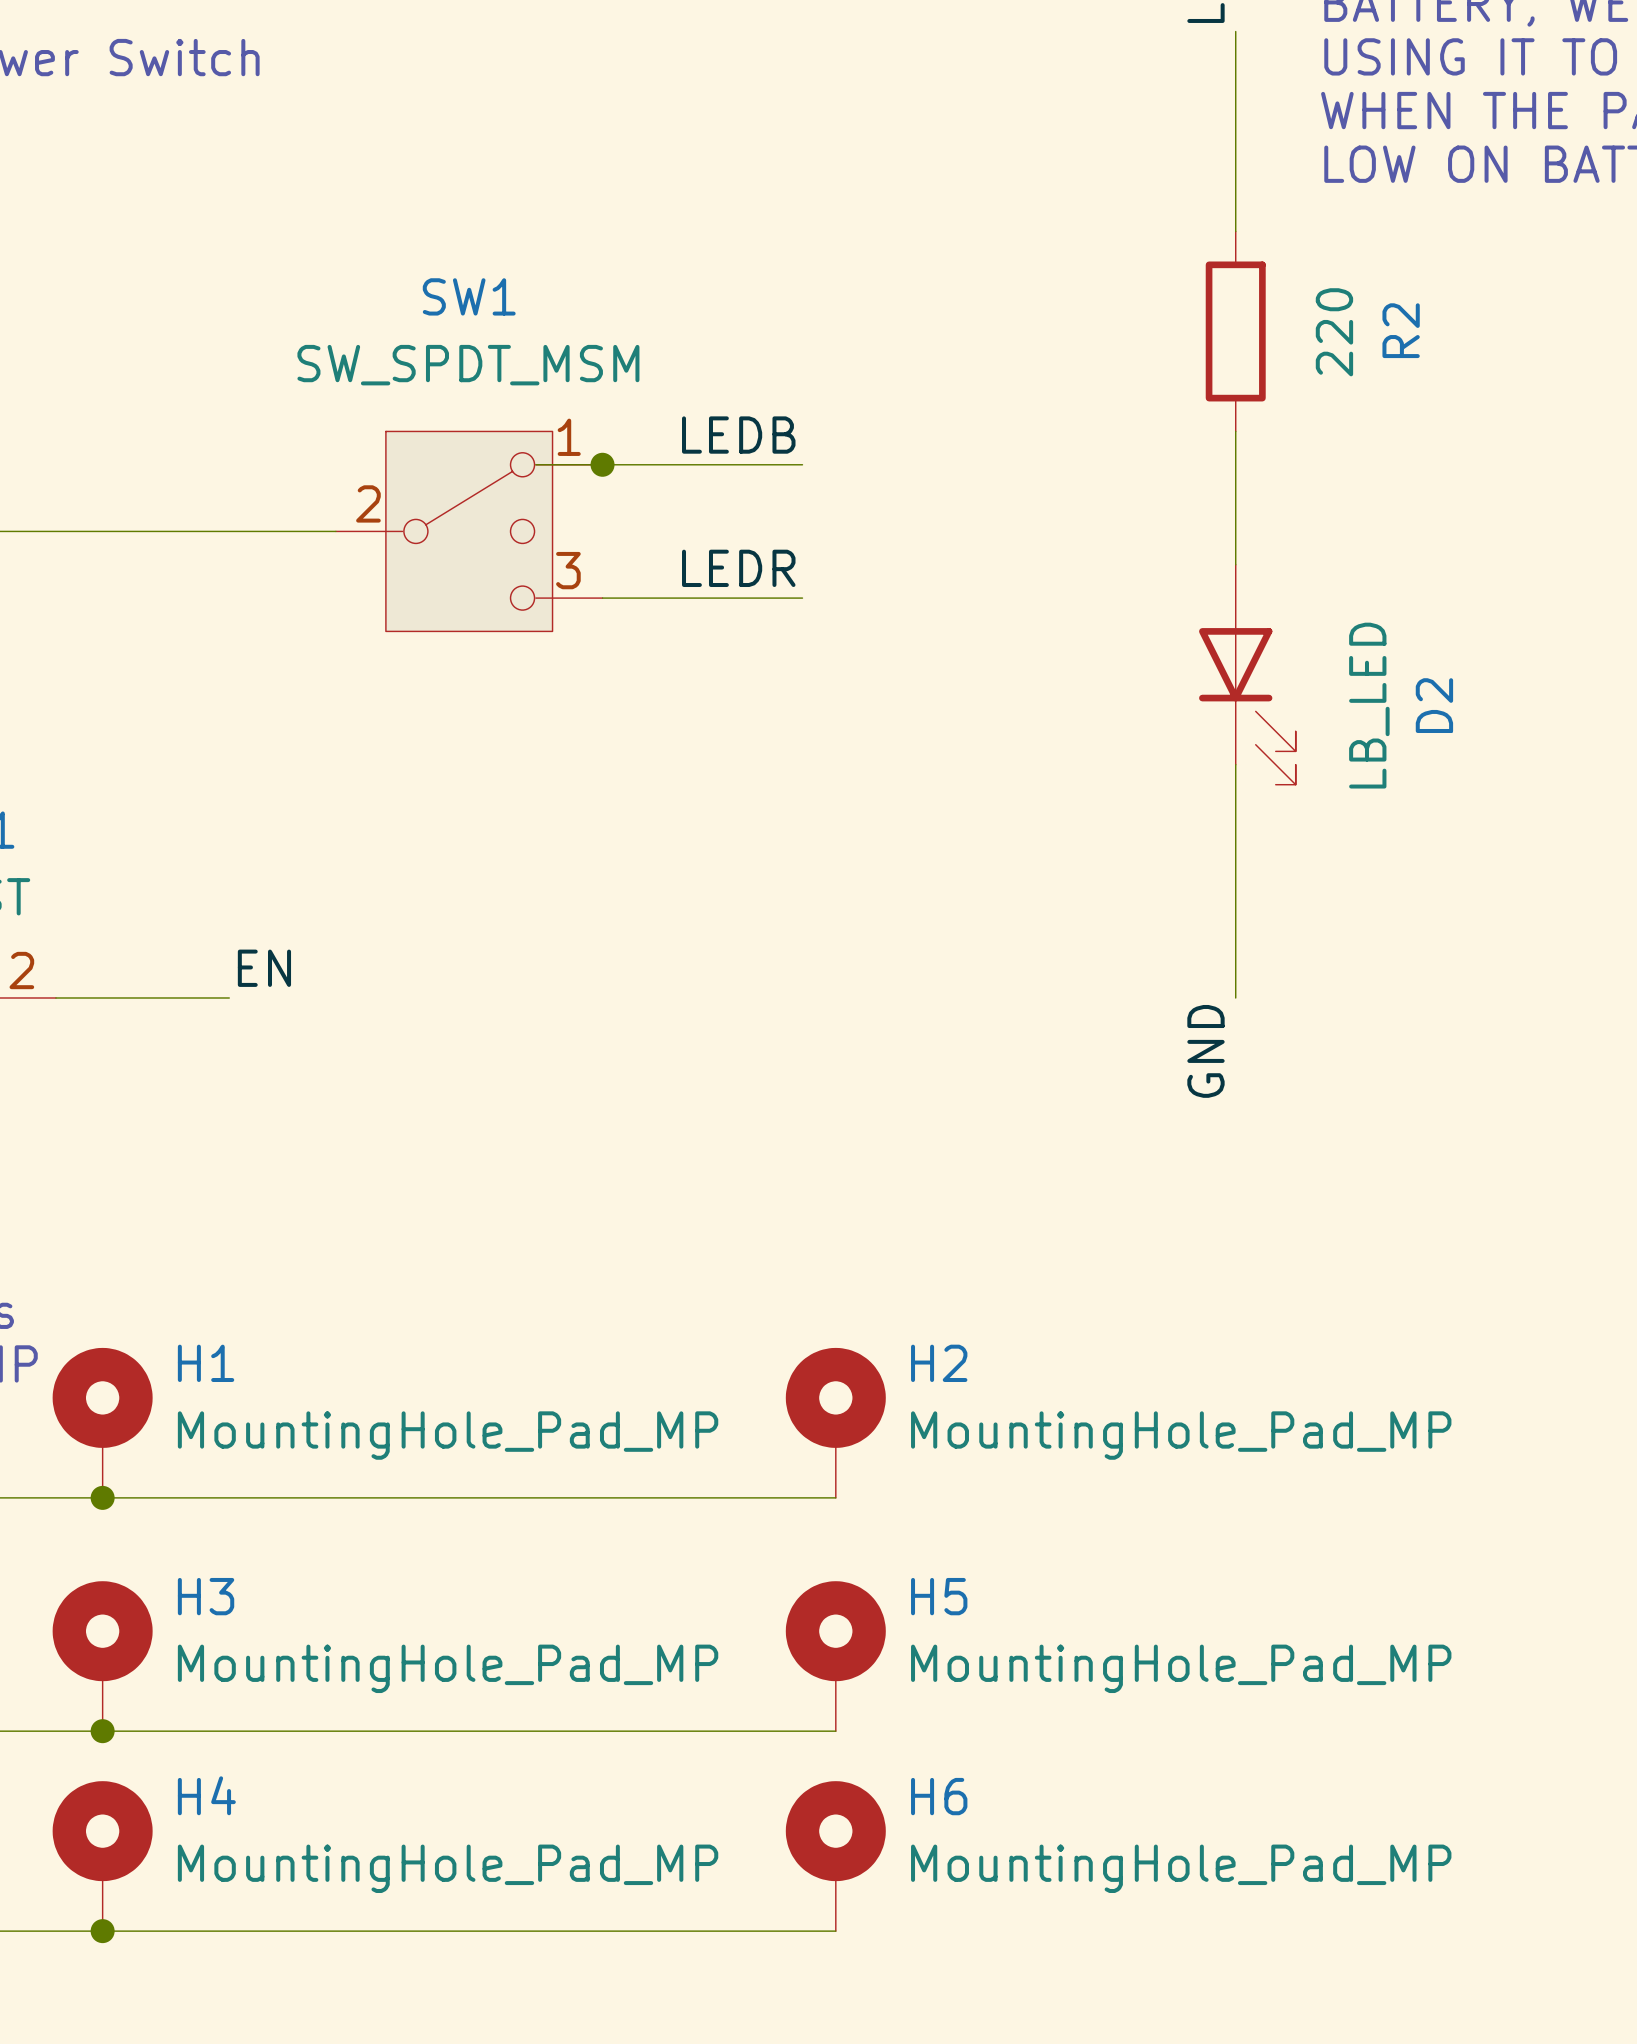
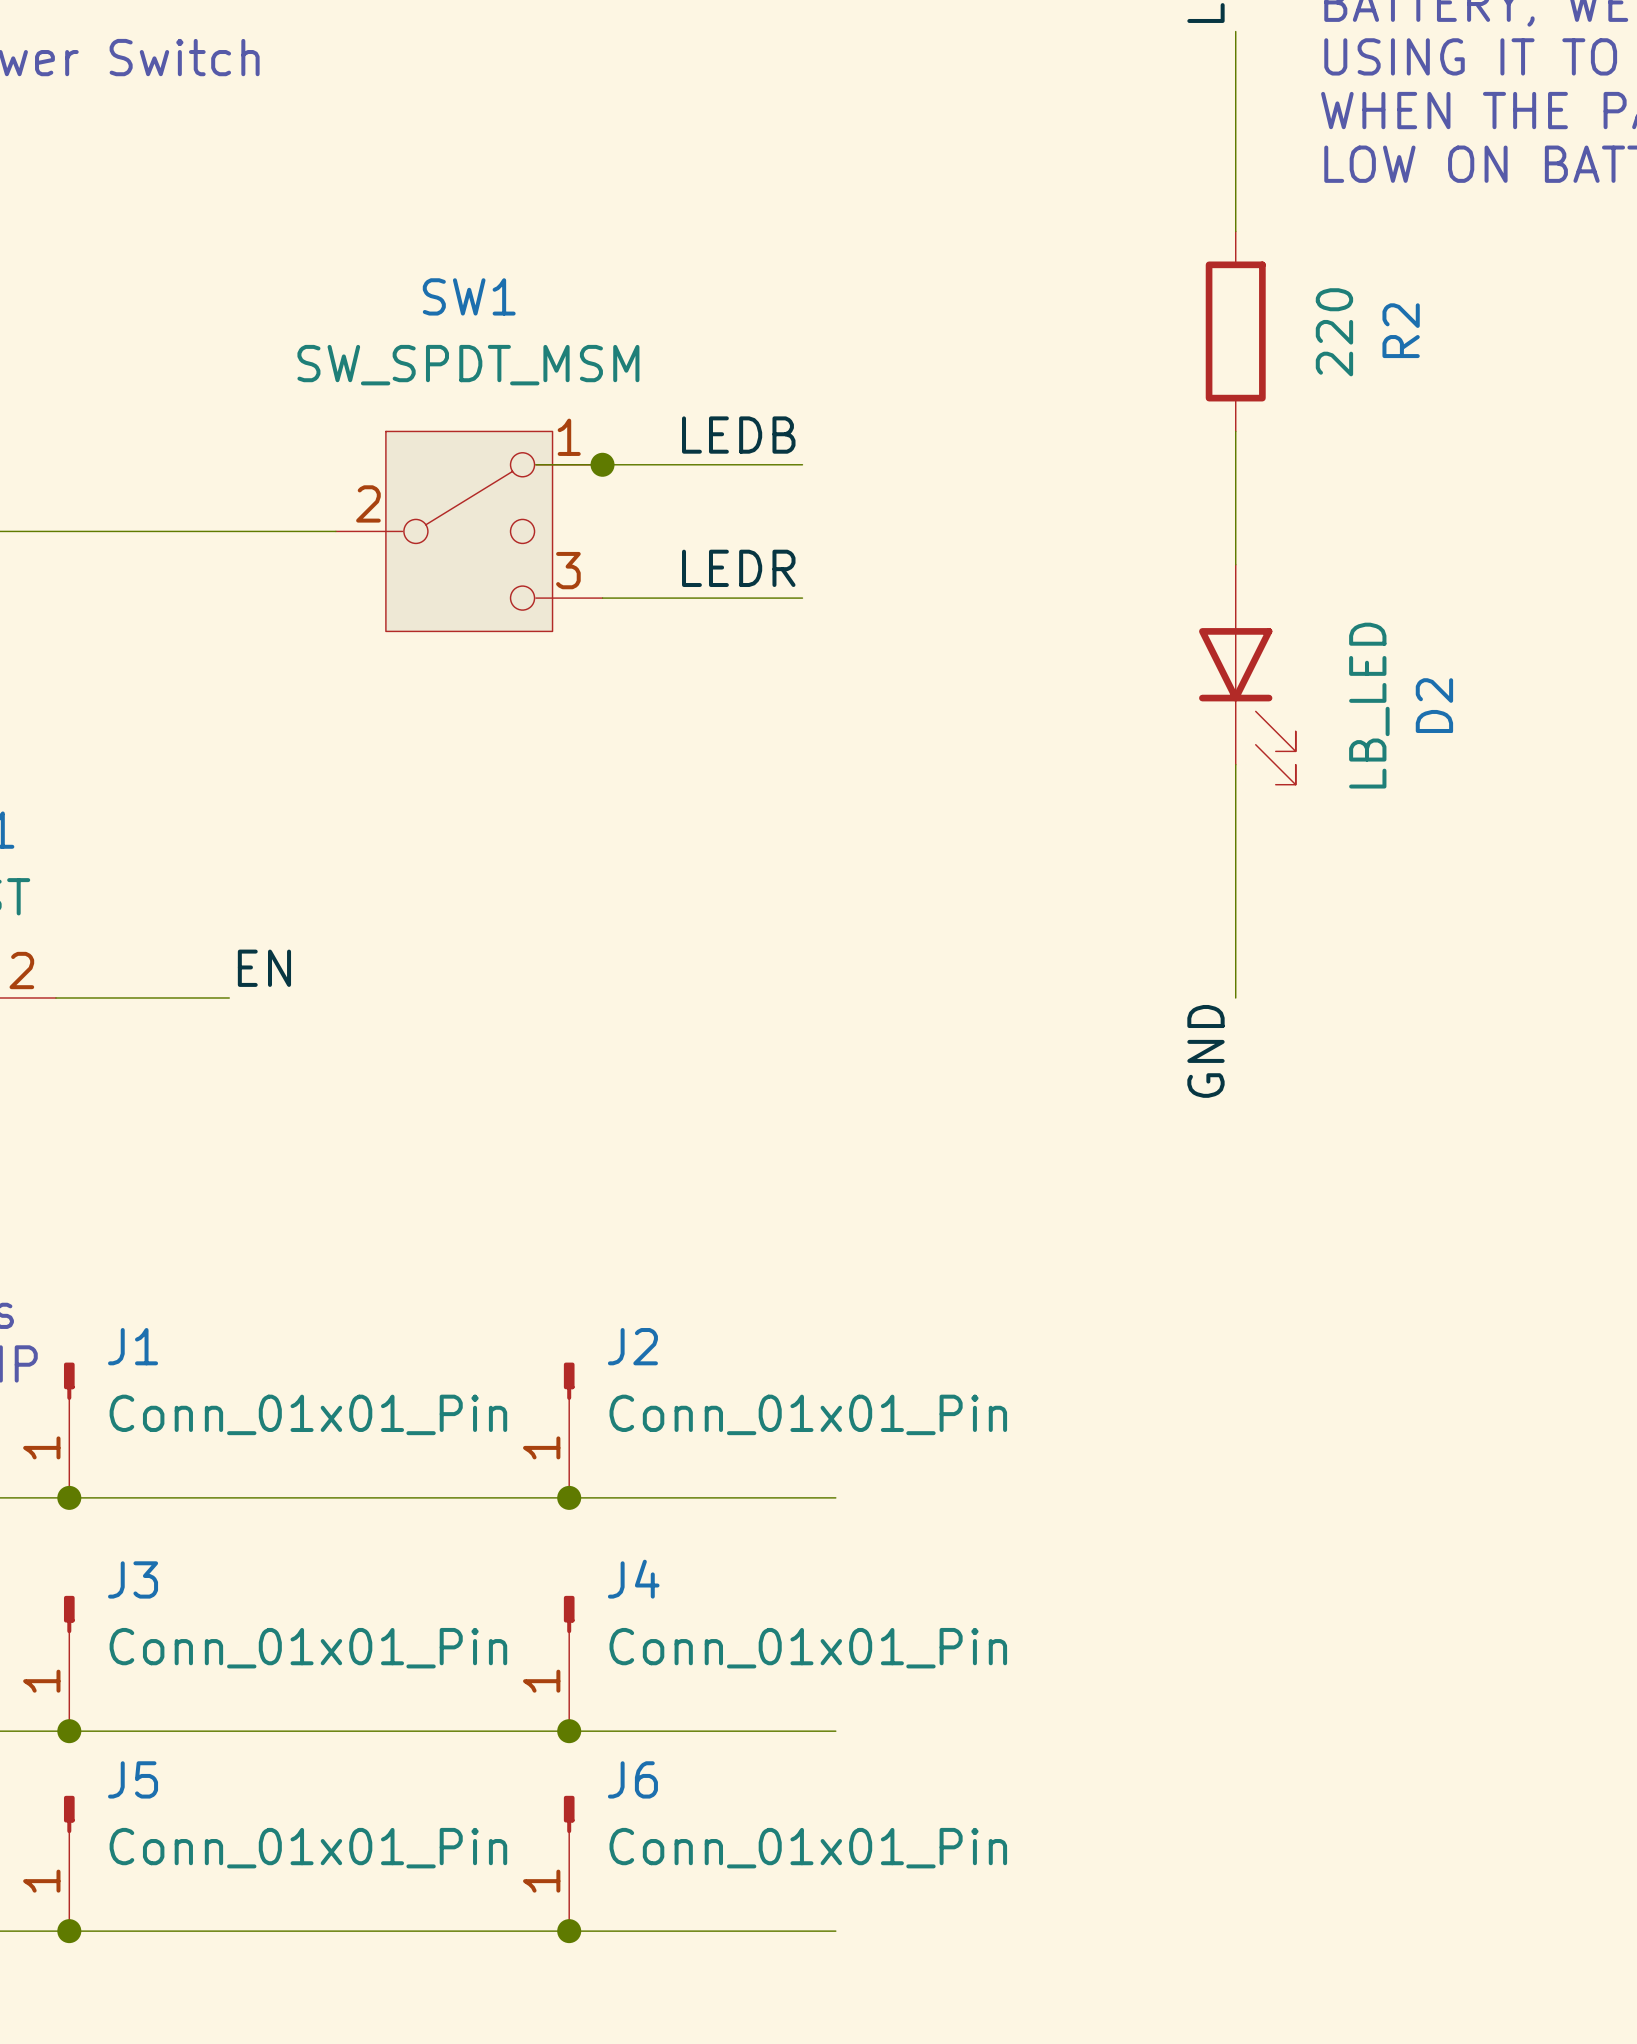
H1: MountingHole_Pad_MP (102, 1422) -> none
H2: MountingHole_Pad_MP (835, 1422) -> none
J1: none -> Conn_01x01_Pin (69, 1430)
J2: none -> Conn_01x01_Pin (569, 1430)
junction position: (102, 1497) -> (69, 1497)
junction: none -> (569, 1497)
H3: MountingHole_Pad_MP (102, 1656) -> none
H5: MountingHole_Pad_MP (835, 1656) -> none
J3: none -> Conn_01x01_Pin (69, 1663)
J4: none -> Conn_01x01_Pin (569, 1663)
junction position: (102, 1731) -> (69, 1731)
junction: none -> (569, 1731)
H4: MountingHole_Pad_MP (102, 1856) -> none
H6: MountingHole_Pad_MP (835, 1856) -> none
J5: none -> Conn_01x01_Pin (69, 1863)
J6: none -> Conn_01x01_Pin (569, 1863)
junction position: (102, 1931) -> (69, 1931)
junction: none -> (569, 1931)

